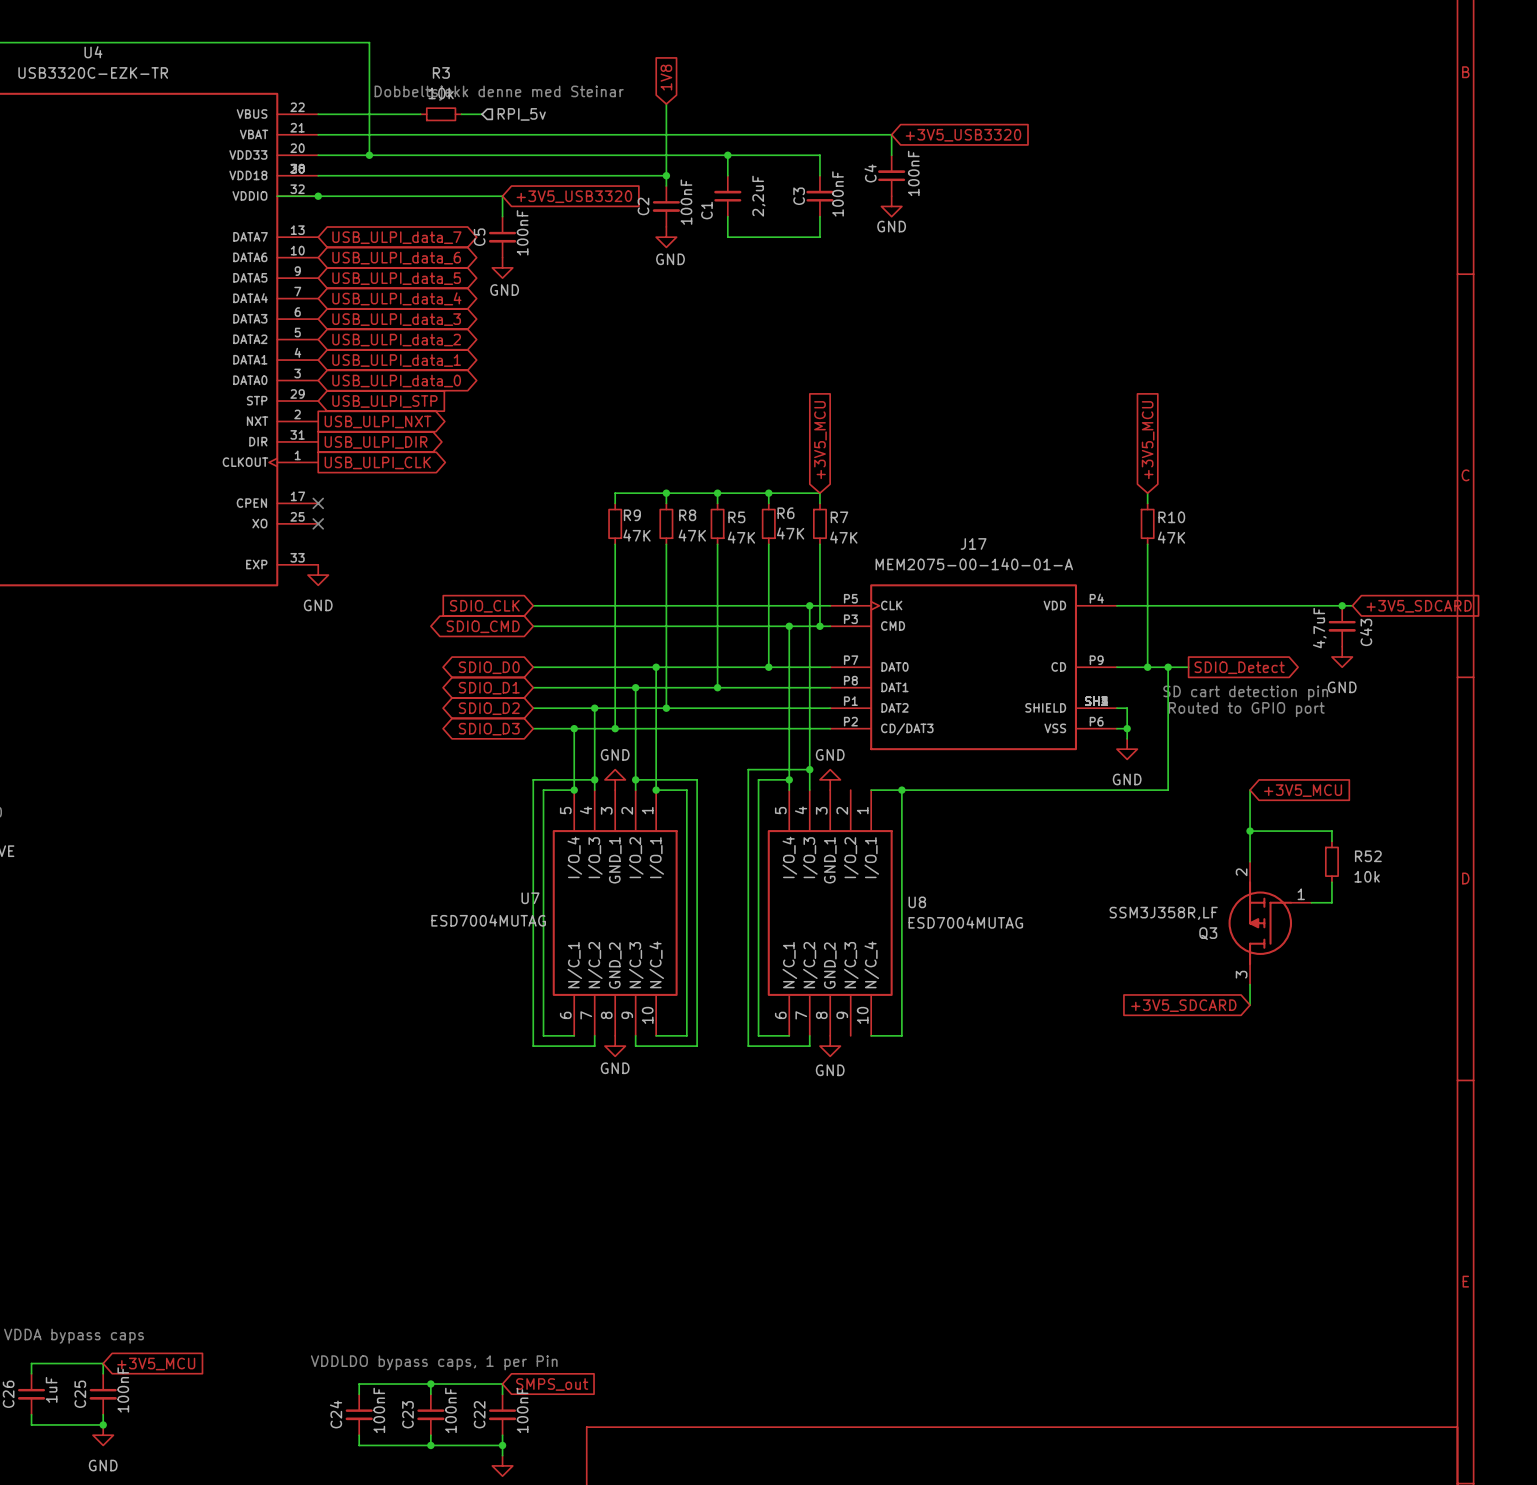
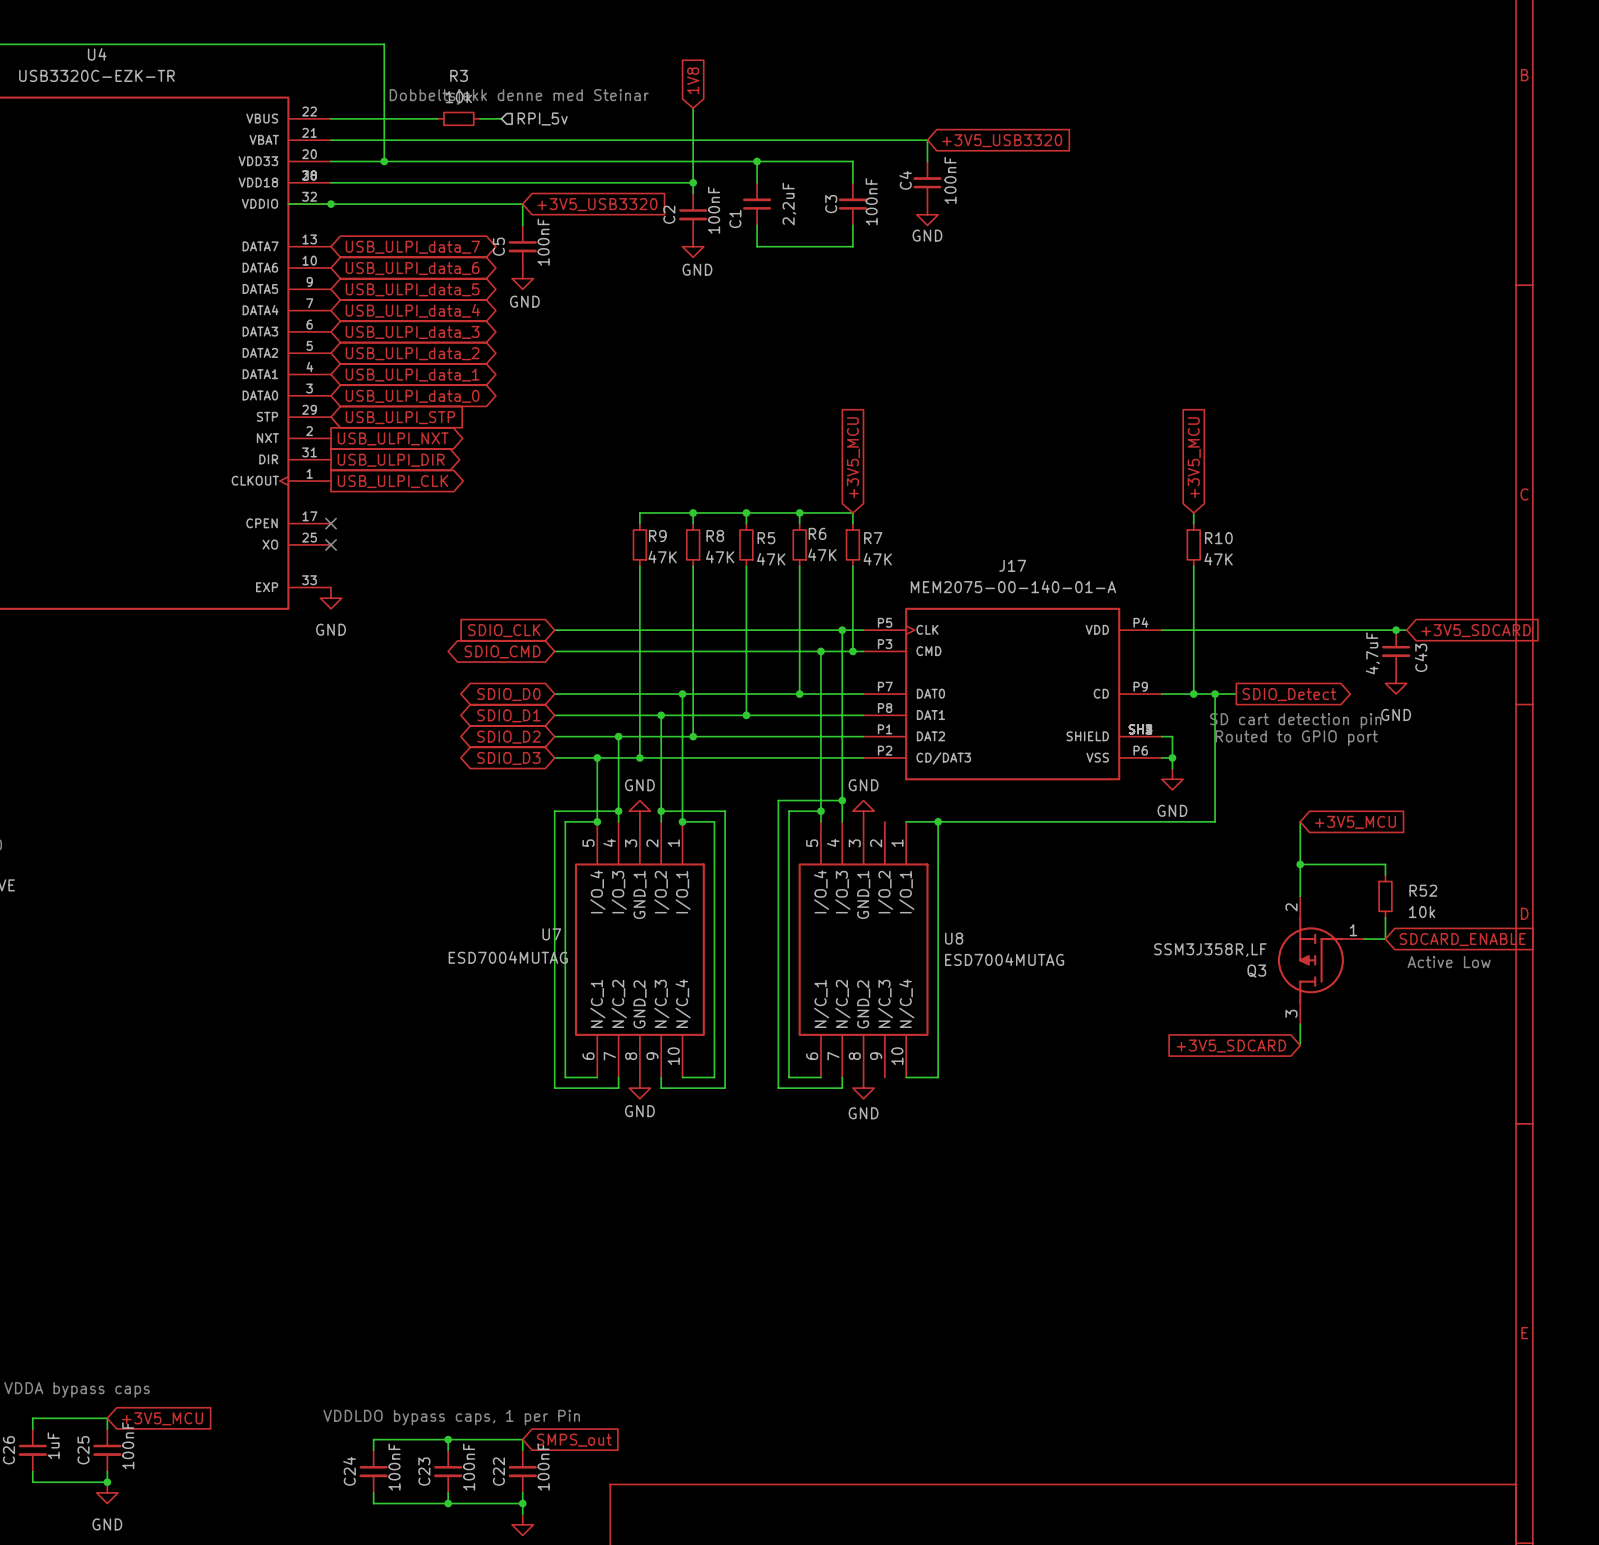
global label: none -> SDCARD_ENABLE (1462, 939)
text: none -> Active Low (1449, 962)

